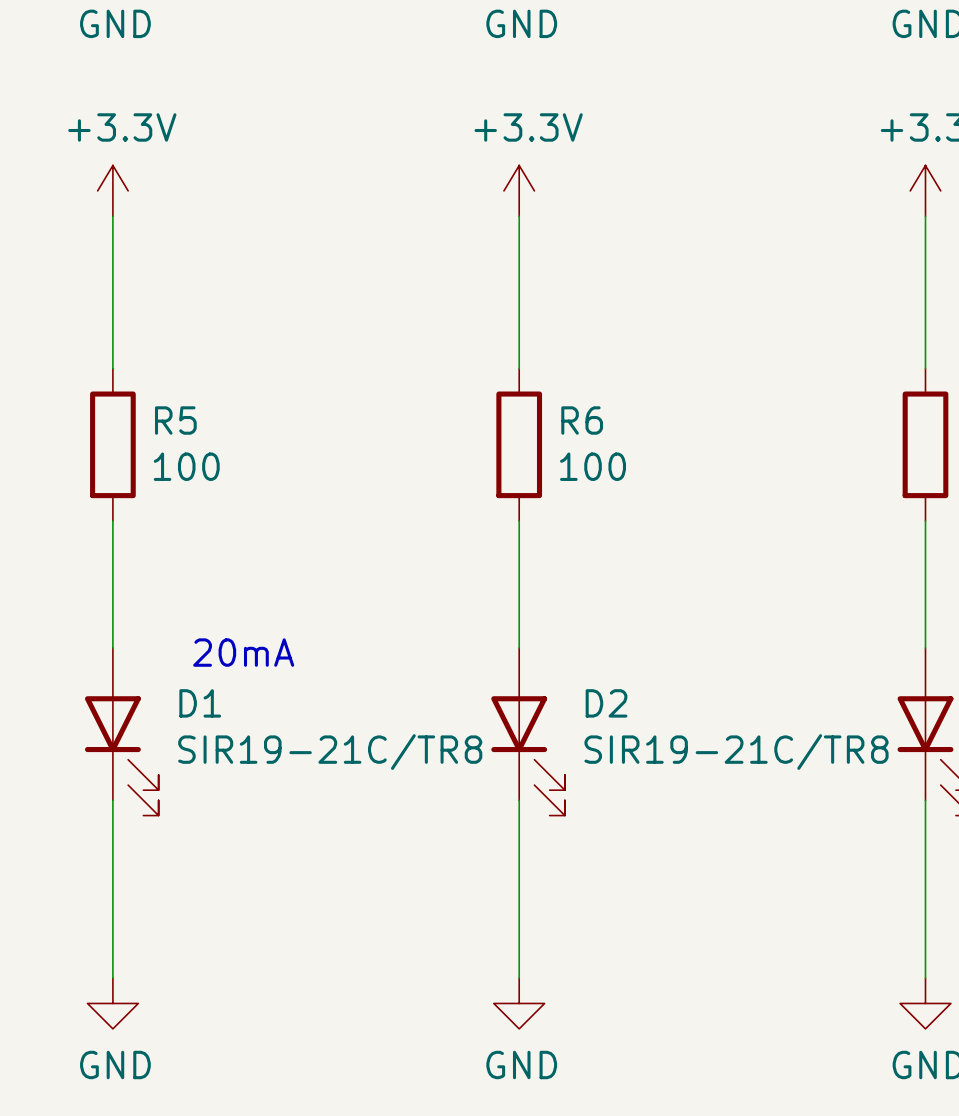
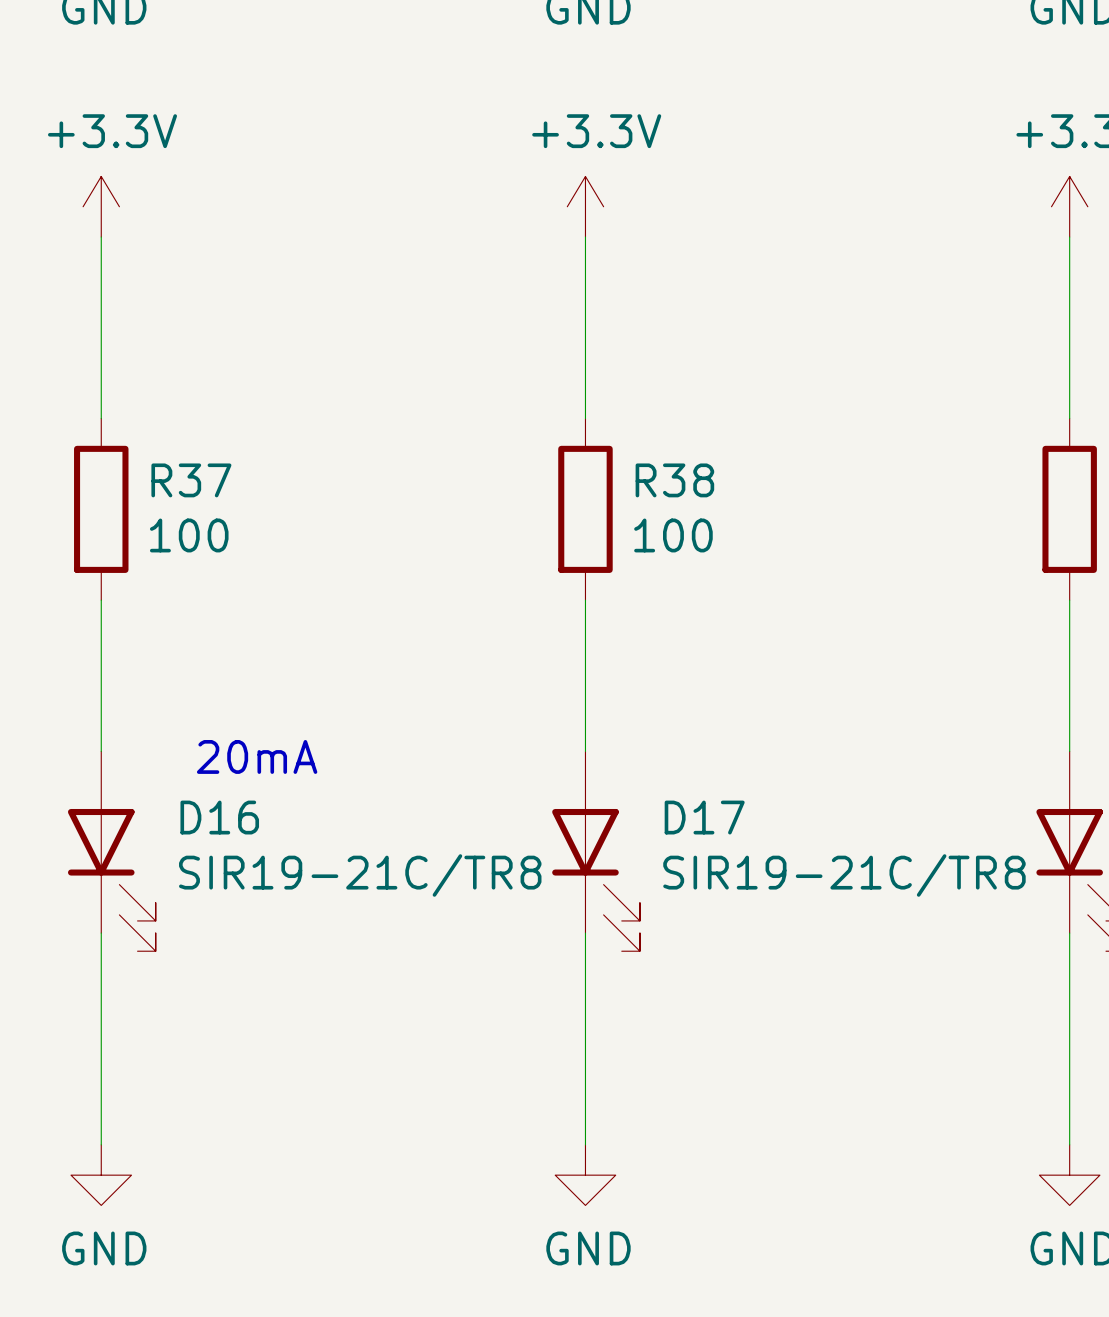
R5 name: R5 (175, 420) -> R37 (191, 480)
R6 name: R6 (582, 420) -> R38 (674, 480)
D1 name: D1 (200, 703) -> D16 (219, 817)
D2 name: D2 (606, 703) -> D17 (704, 817)

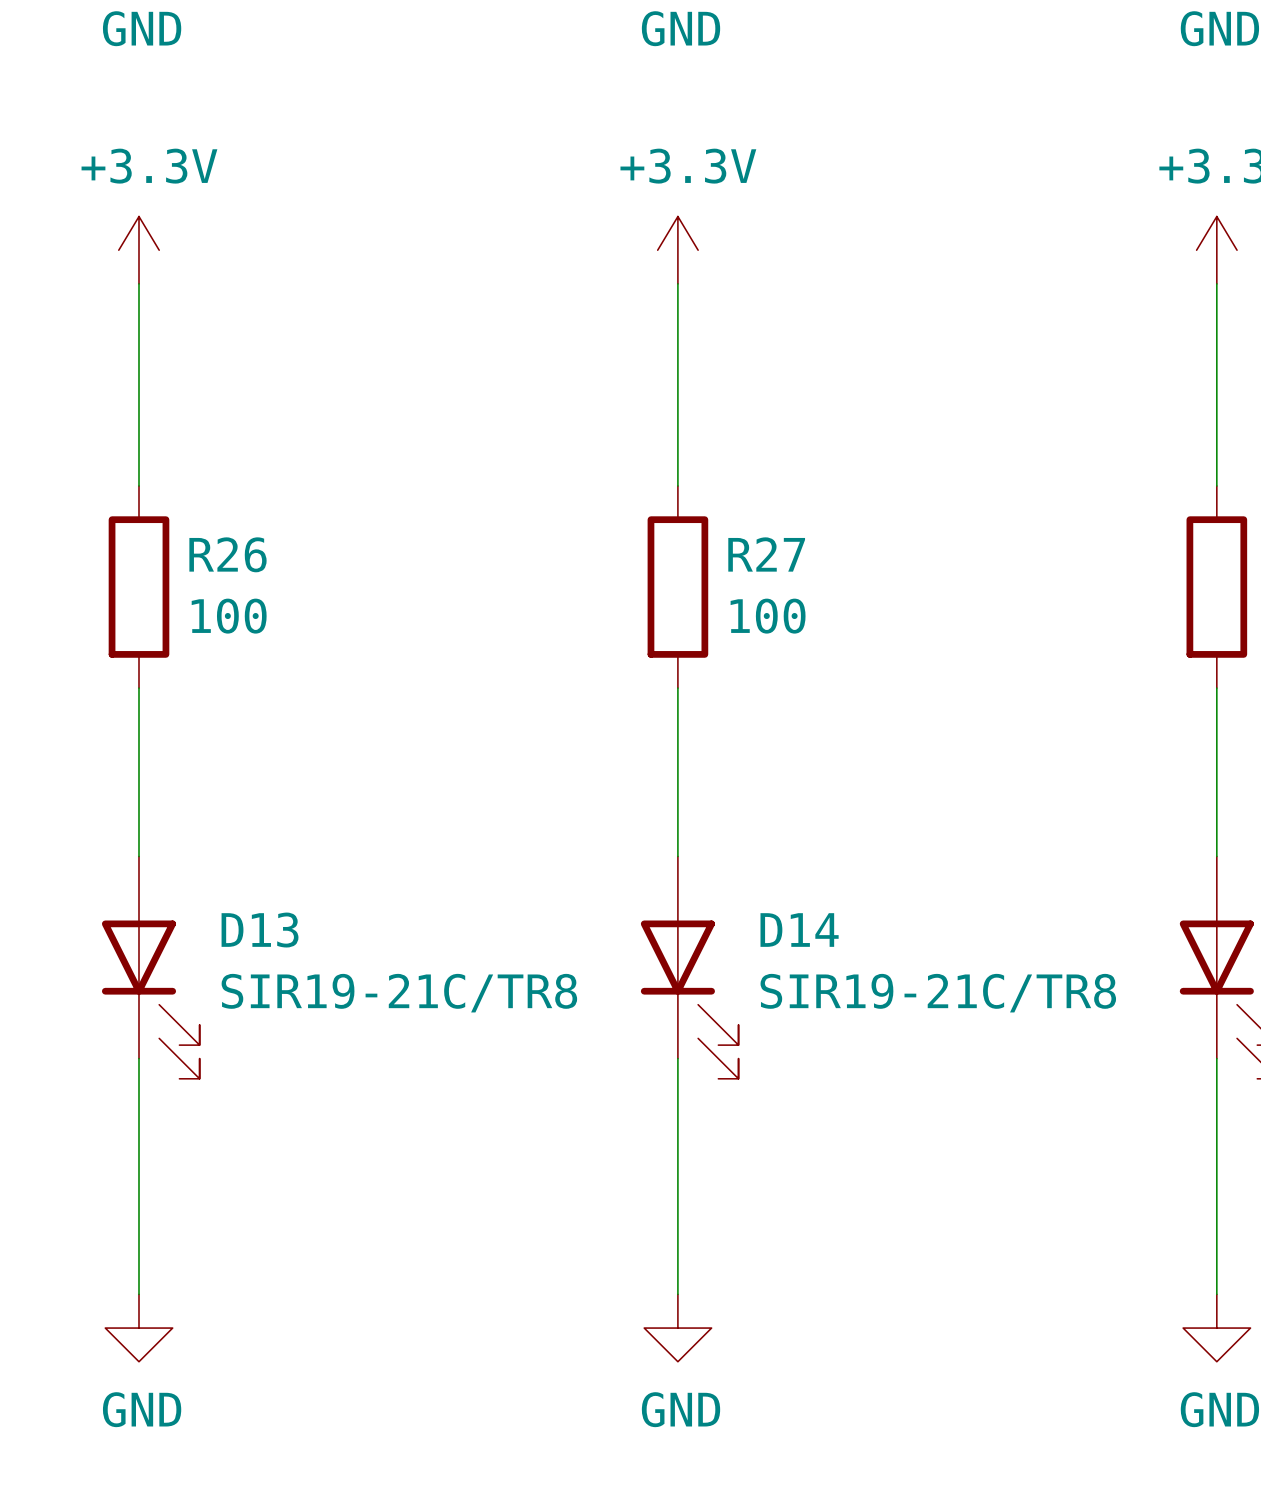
R37 name: R37 (191, 480) -> R26 (227, 554)
R38 name: R38 (674, 480) -> R27 (766, 554)
text: 20mA (257, 756) -> none
D16 name: D16 (219, 817) -> D13 (260, 930)
D17 name: D17 (704, 817) -> D14 (799, 930)

